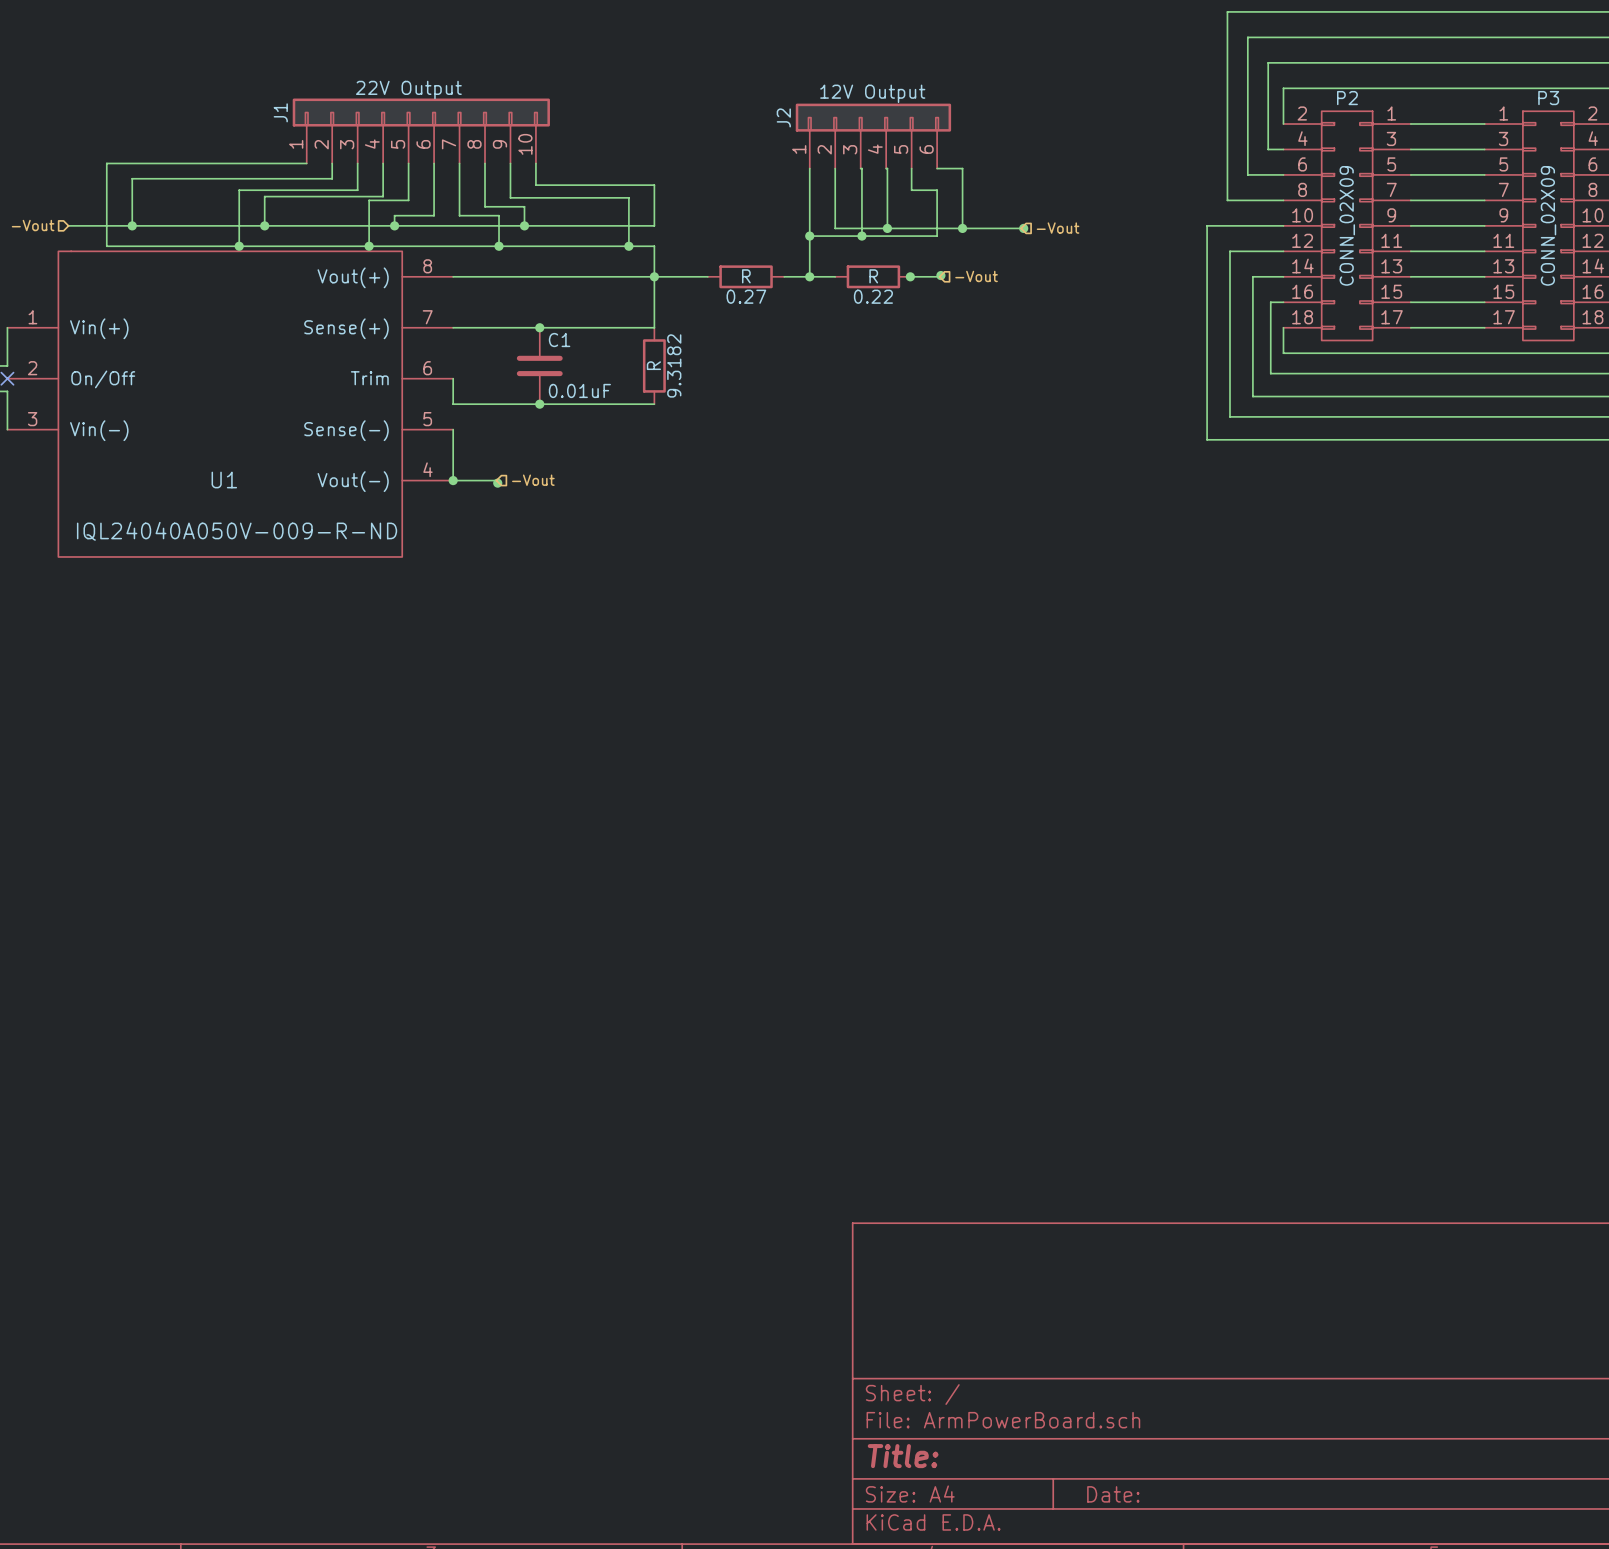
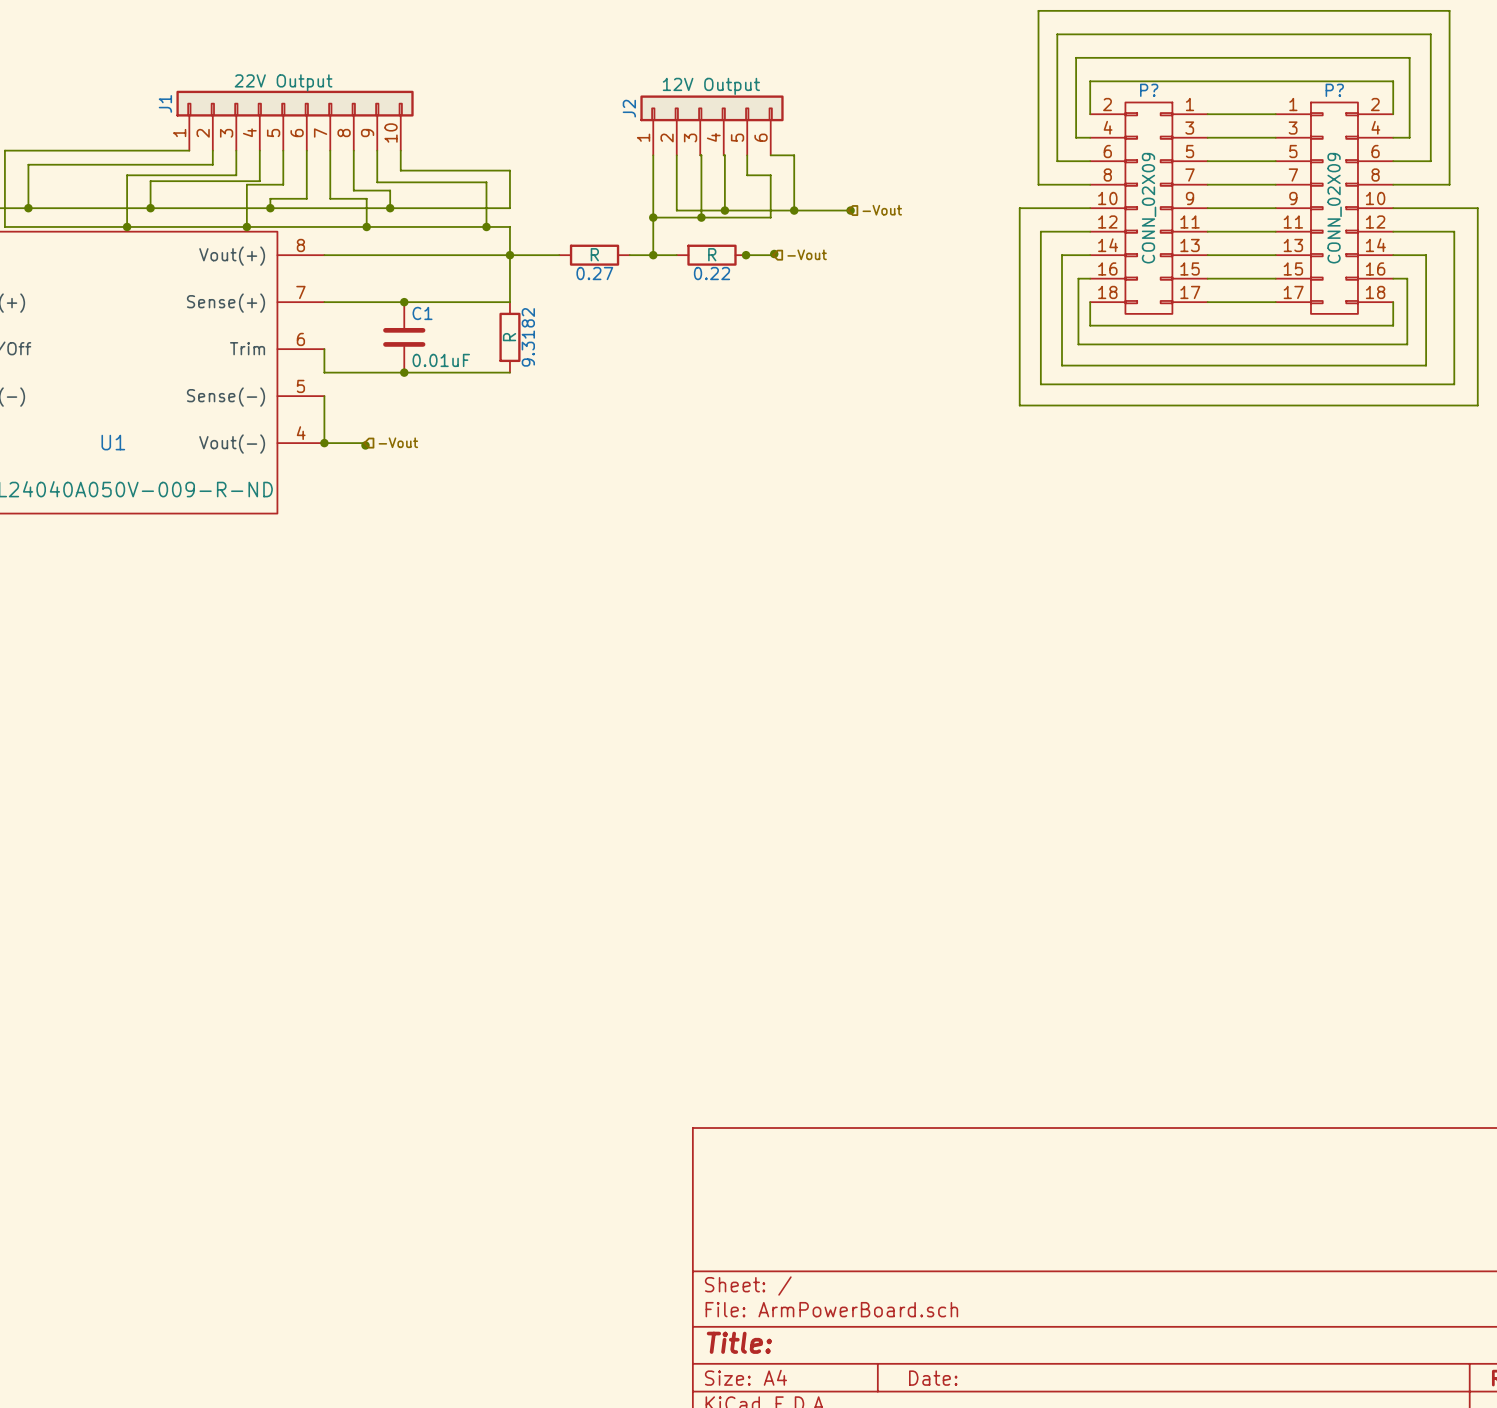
P2 name: P2 (1347, 98) -> P? (1149, 90)
P3 name: P3 (1548, 98) -> P? (1334, 90)

